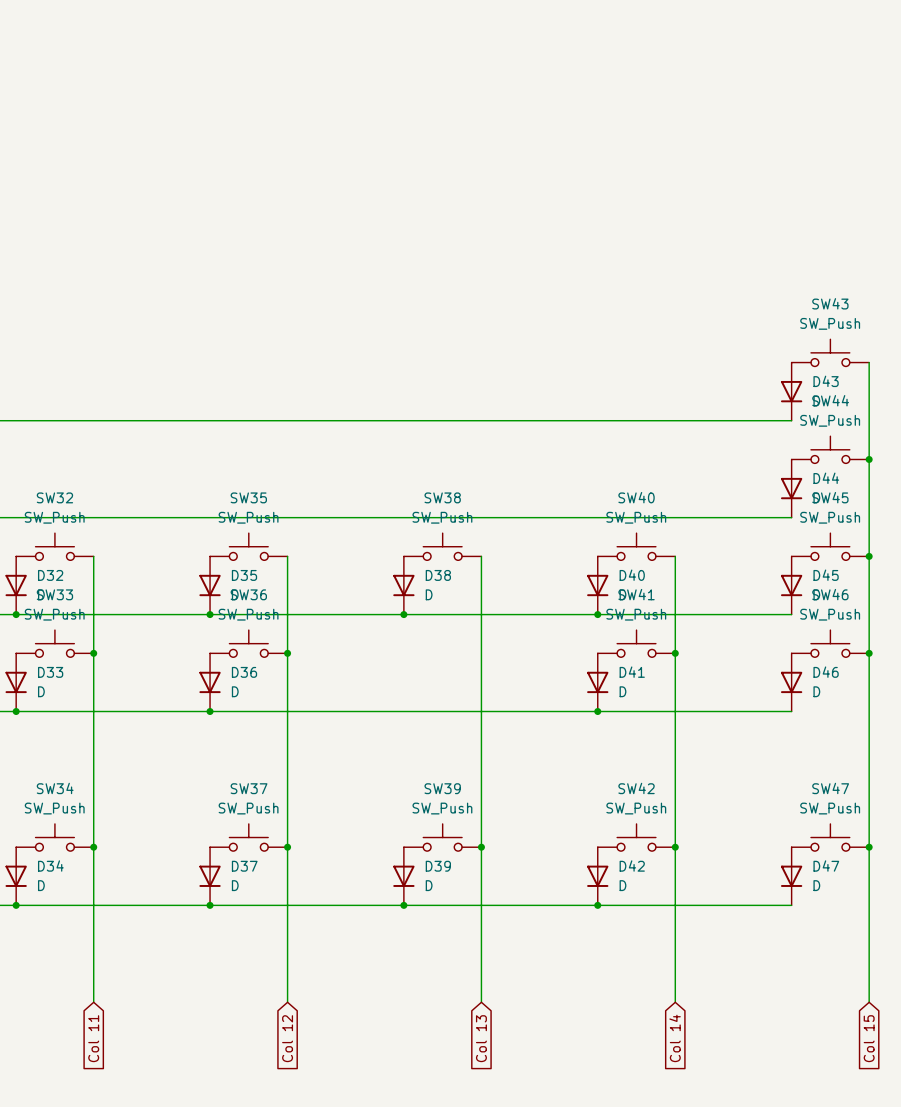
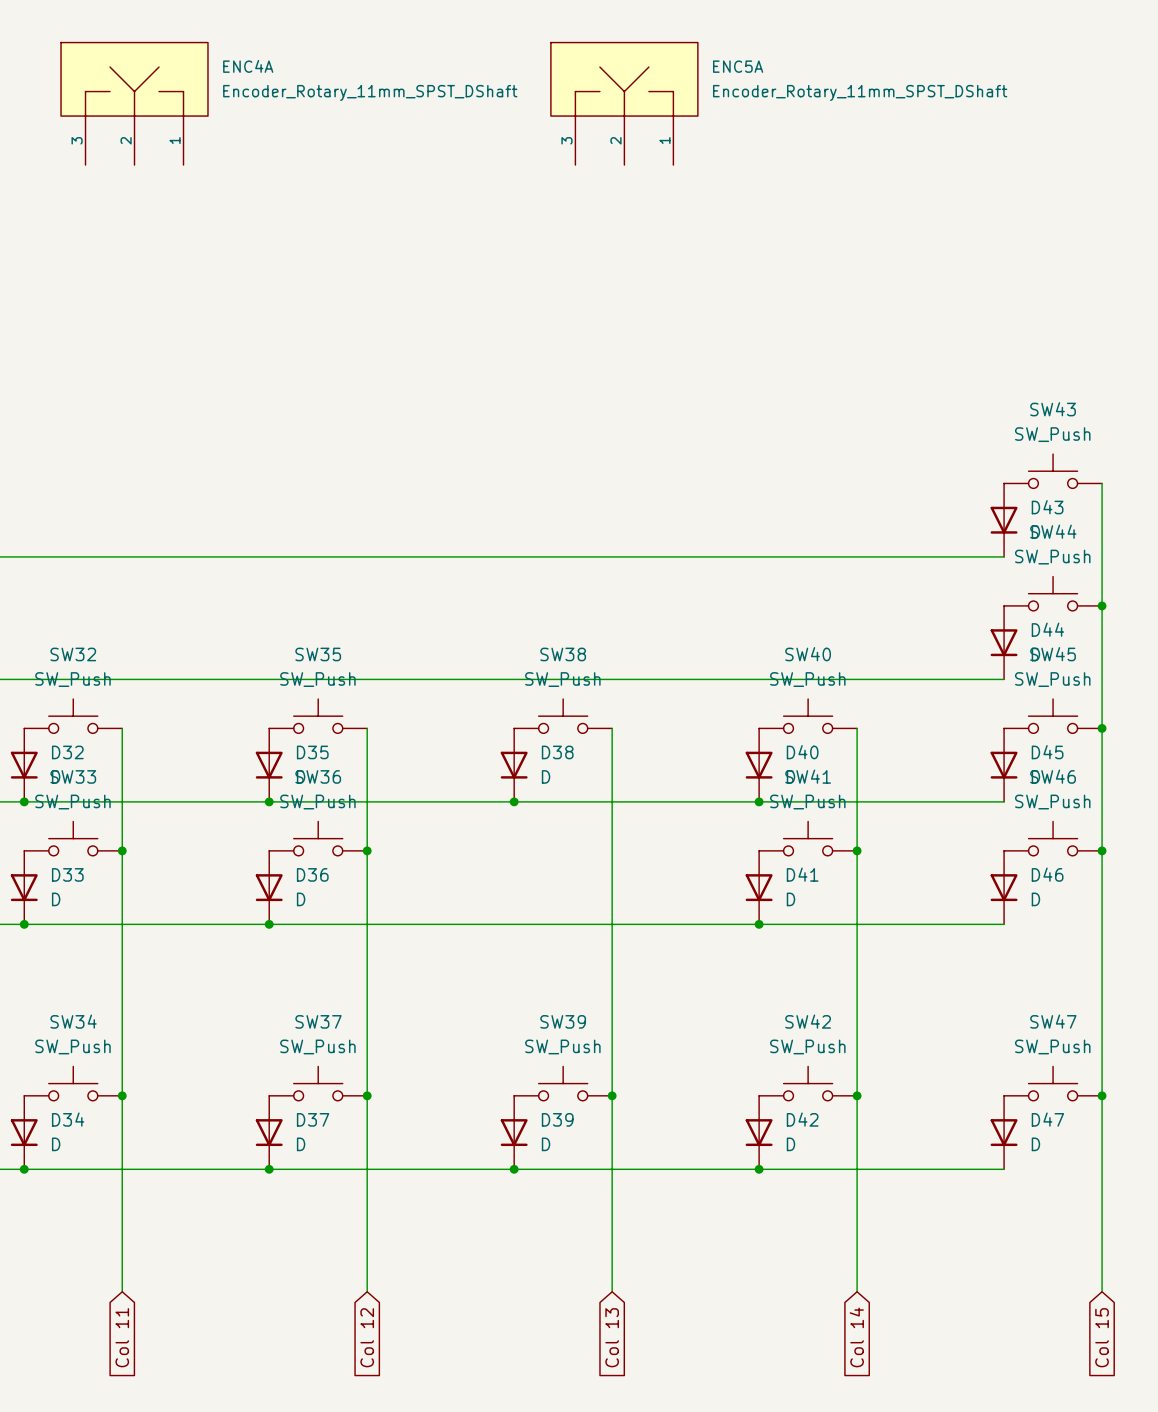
ENC4A: none -> Encoder_Rotary_11mm_SPST_DShaft (134, 103)
ENC5A: none -> Encoder_Rotary_11mm_SPST_DShaft (624, 103)

